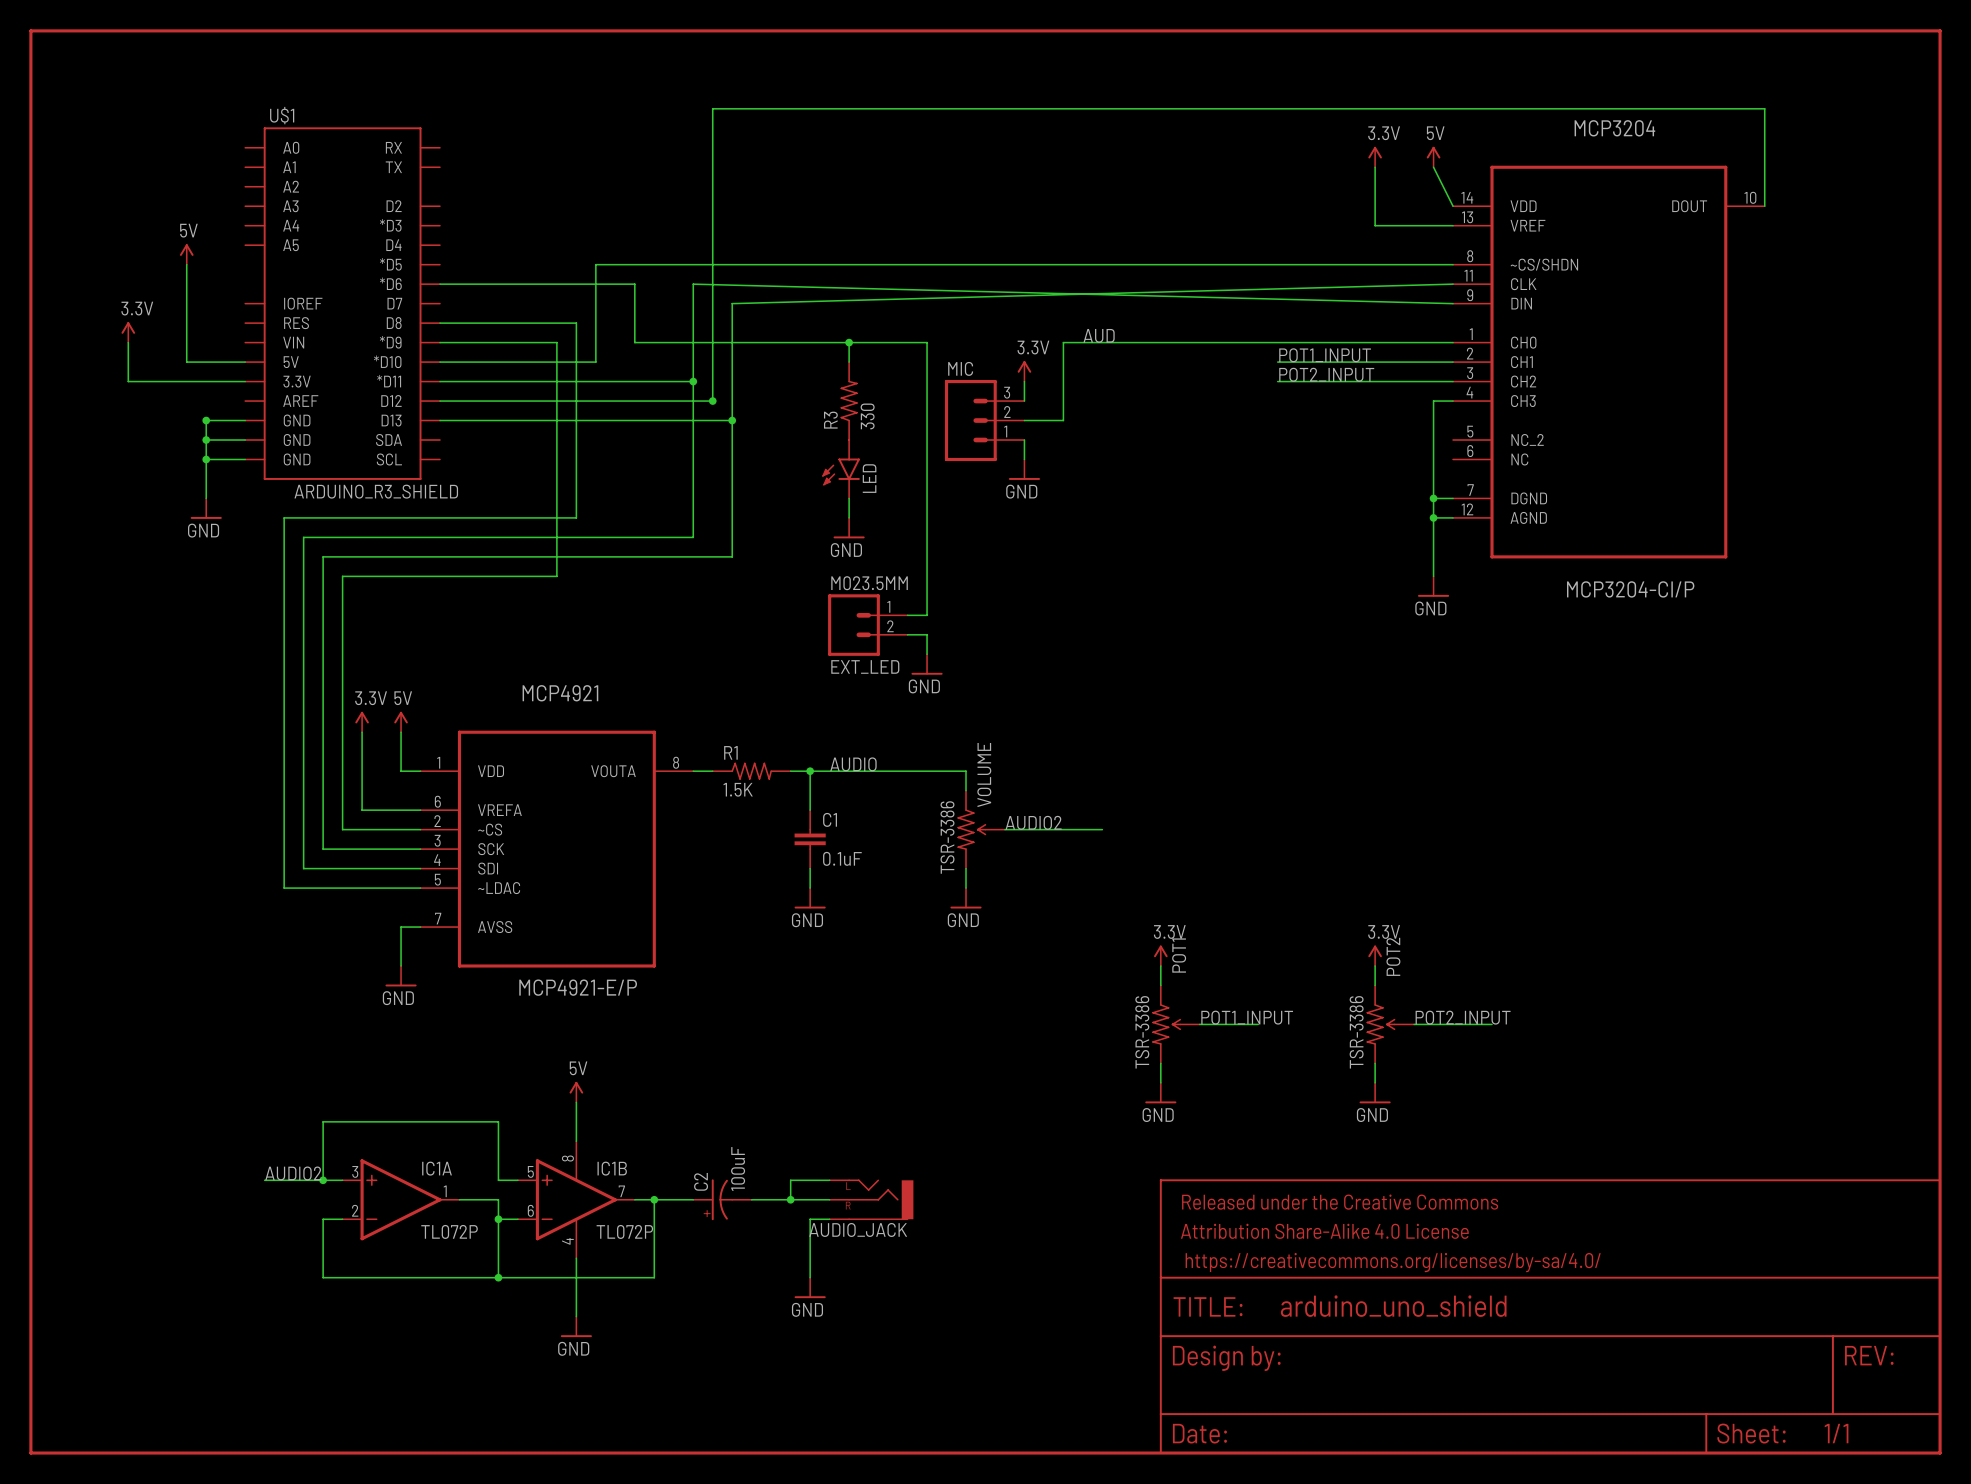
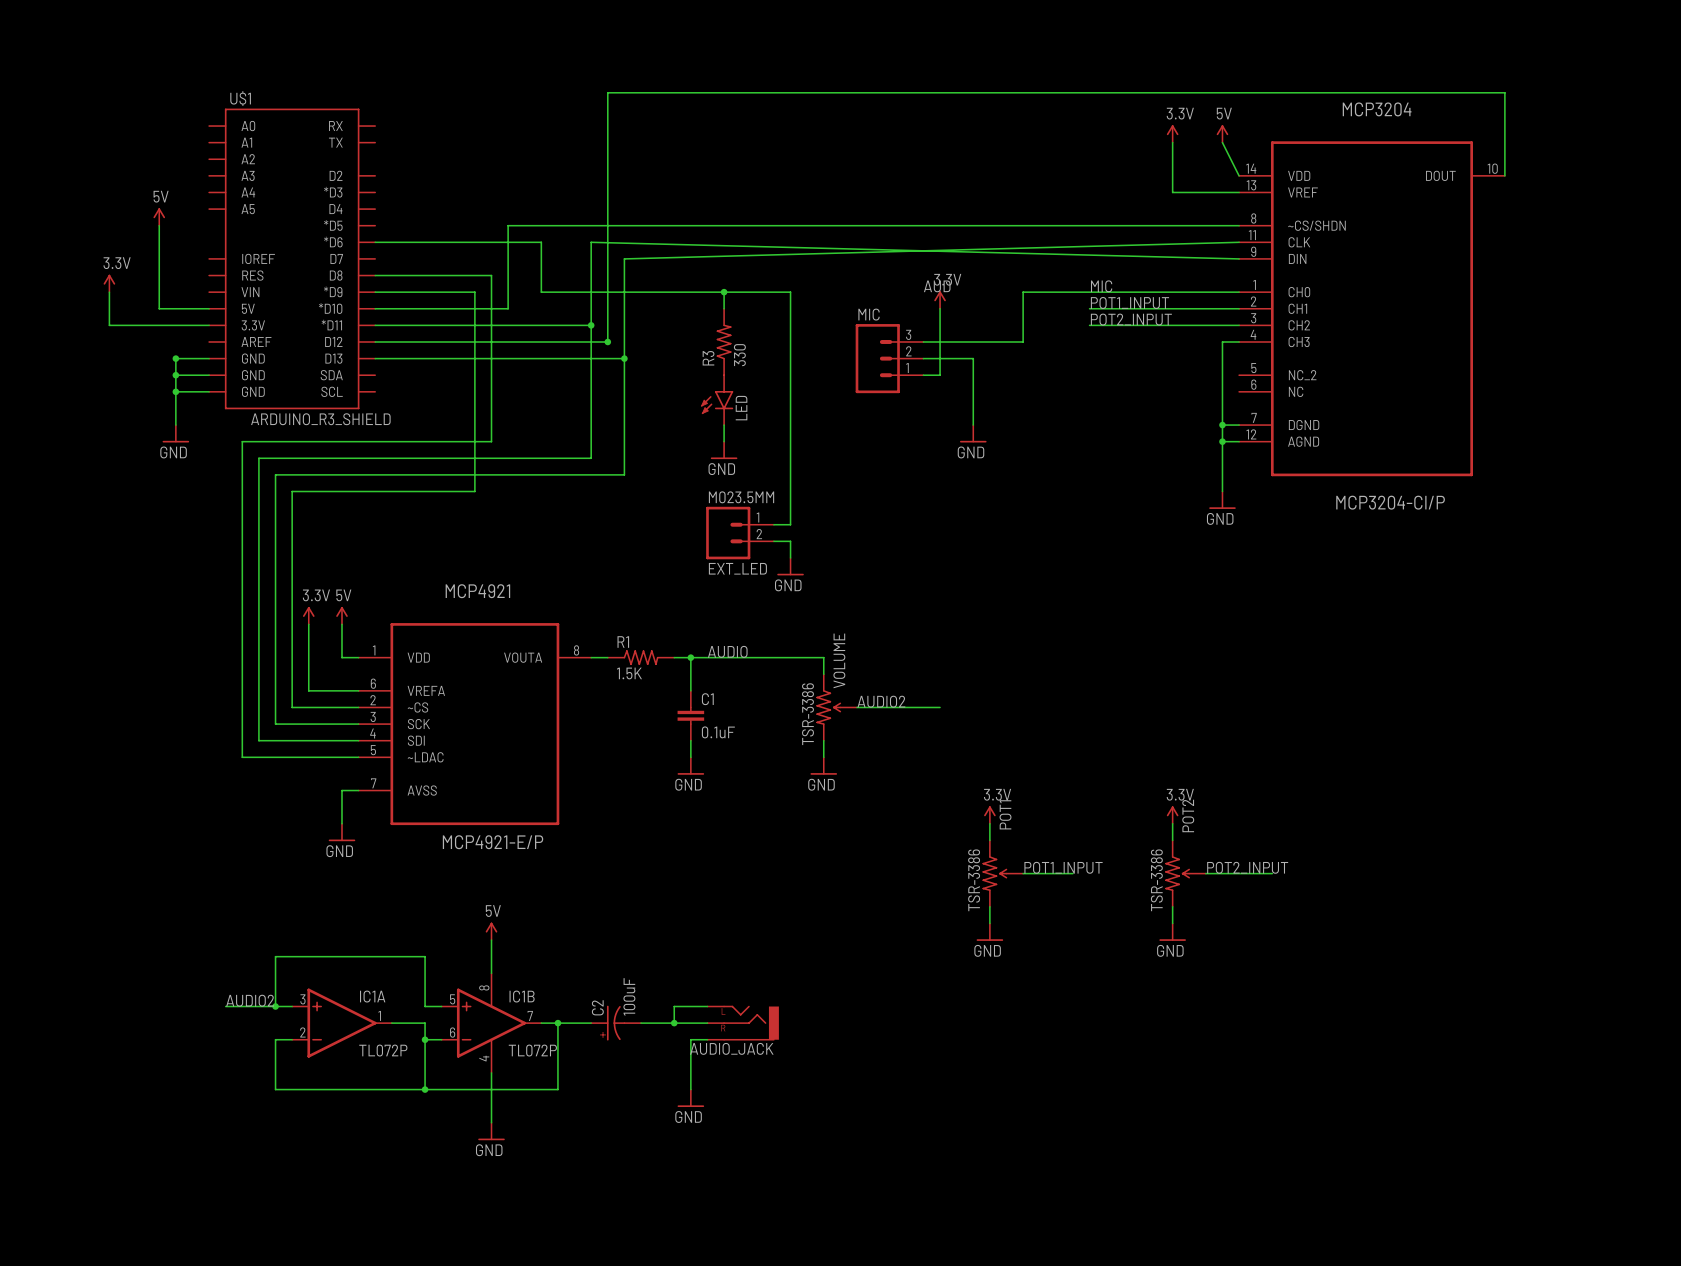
label: none -> MIC (1101, 286)
wire: (1199, 342) (1063, 342) (1063, 420) (1024, 420) -> (1023, 292) (1023, 341) (923, 341)
wire: none -> (940, 308) (940, 375) (923, 375)
power symbol position: 3.3V (1024, 371) -> 3.3V (940, 300)
wire: (1024, 381) (1024, 401) -> none
MIC position: (984, 420) -> (889, 358)
wire: none -> (923, 358) (973, 358) (973, 425)
wire: (1024, 440) (1024, 459) -> none
power symbol position: GND (1024, 469) -> GND (973, 433)
part: (985, 741) -> none
part: (1550, 1316) -> none

